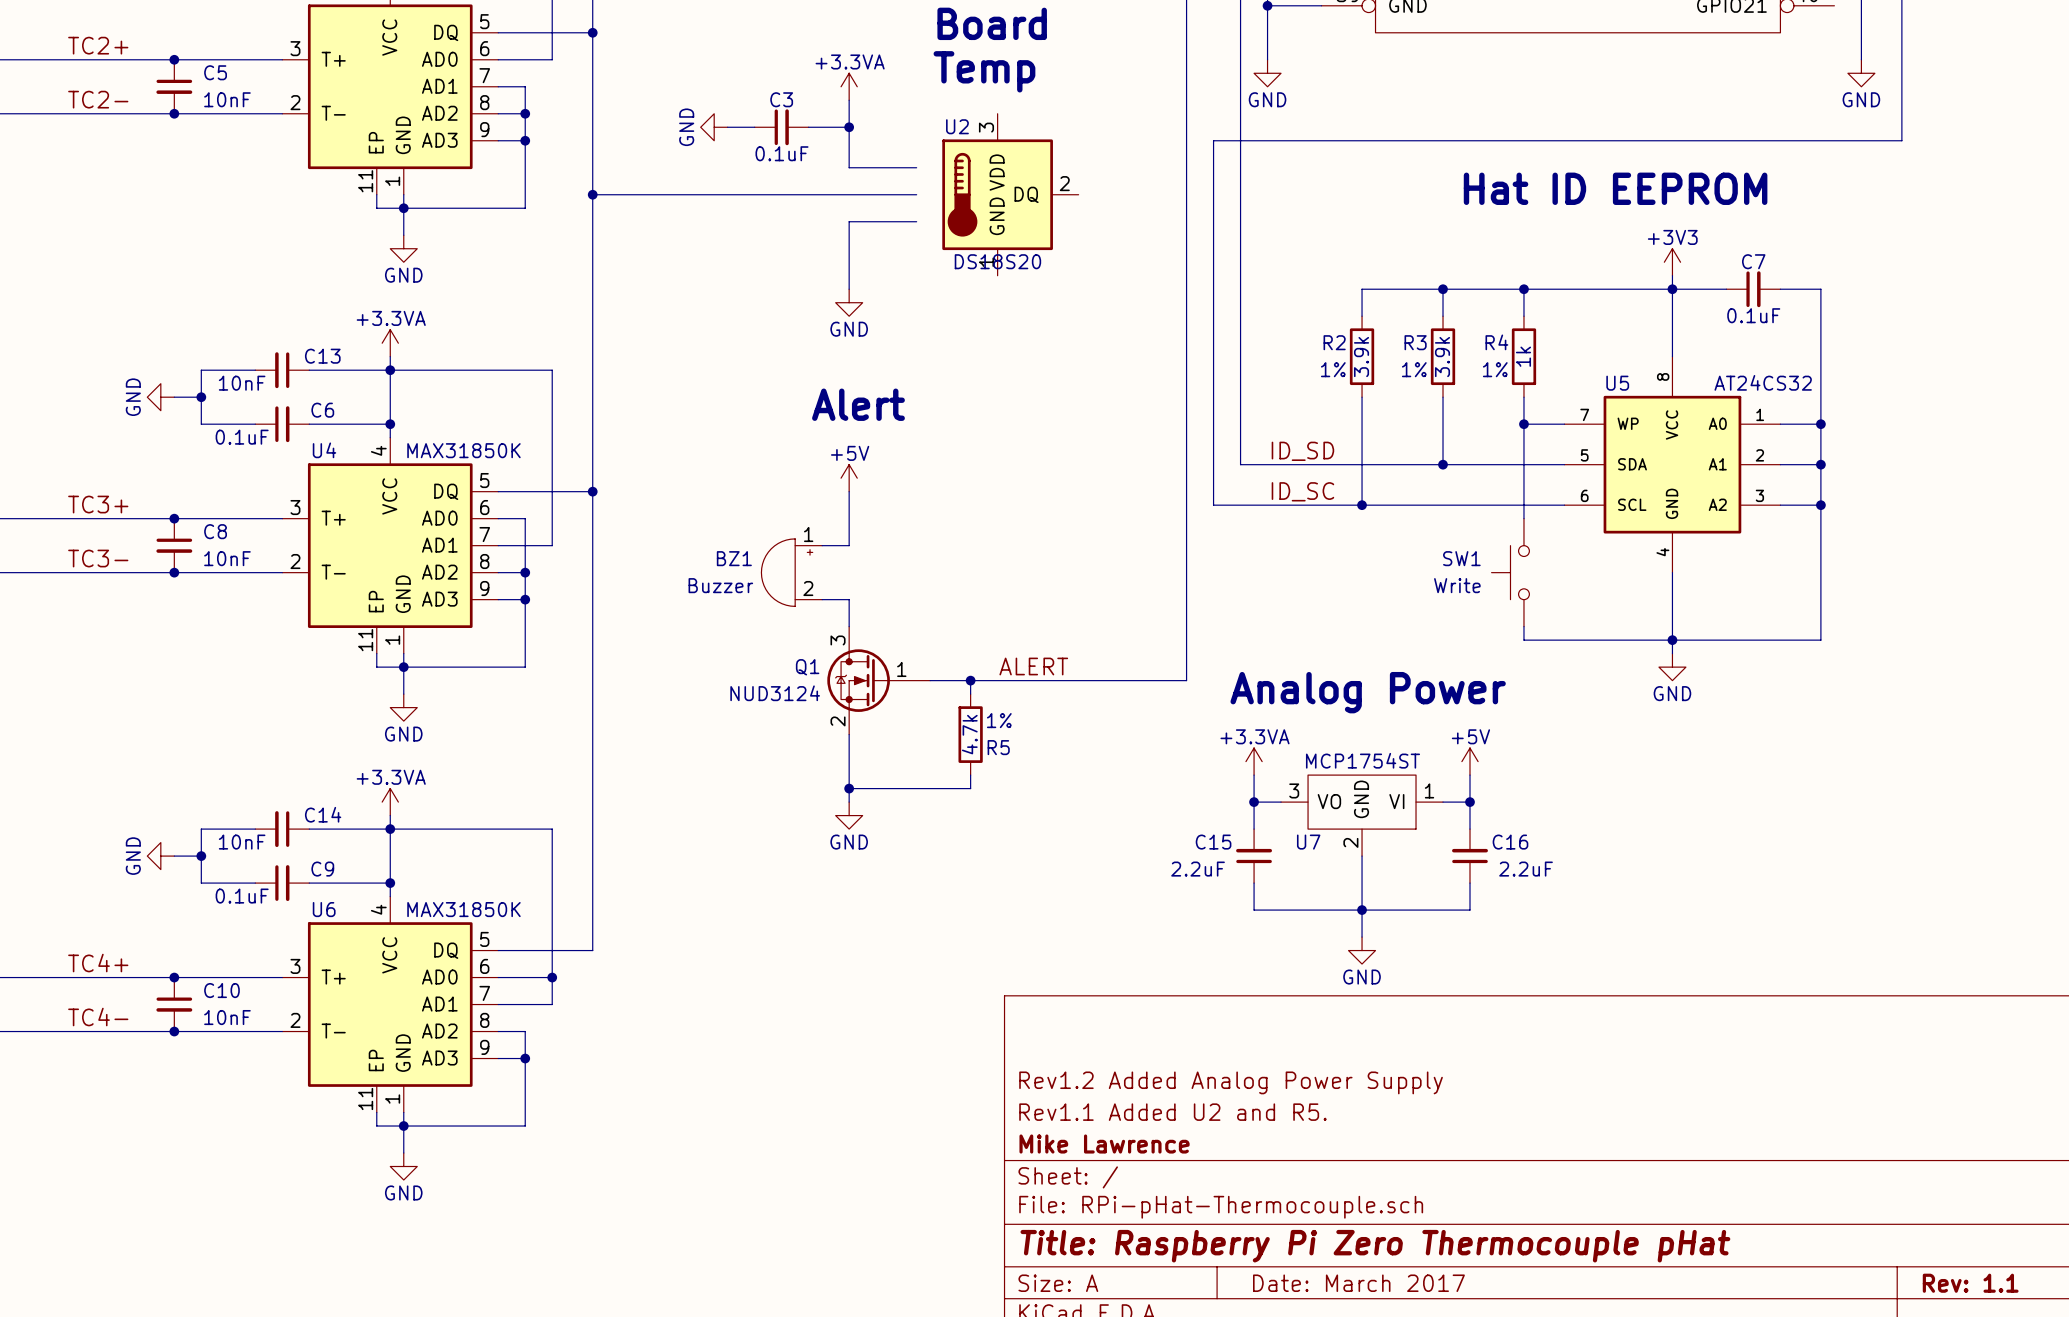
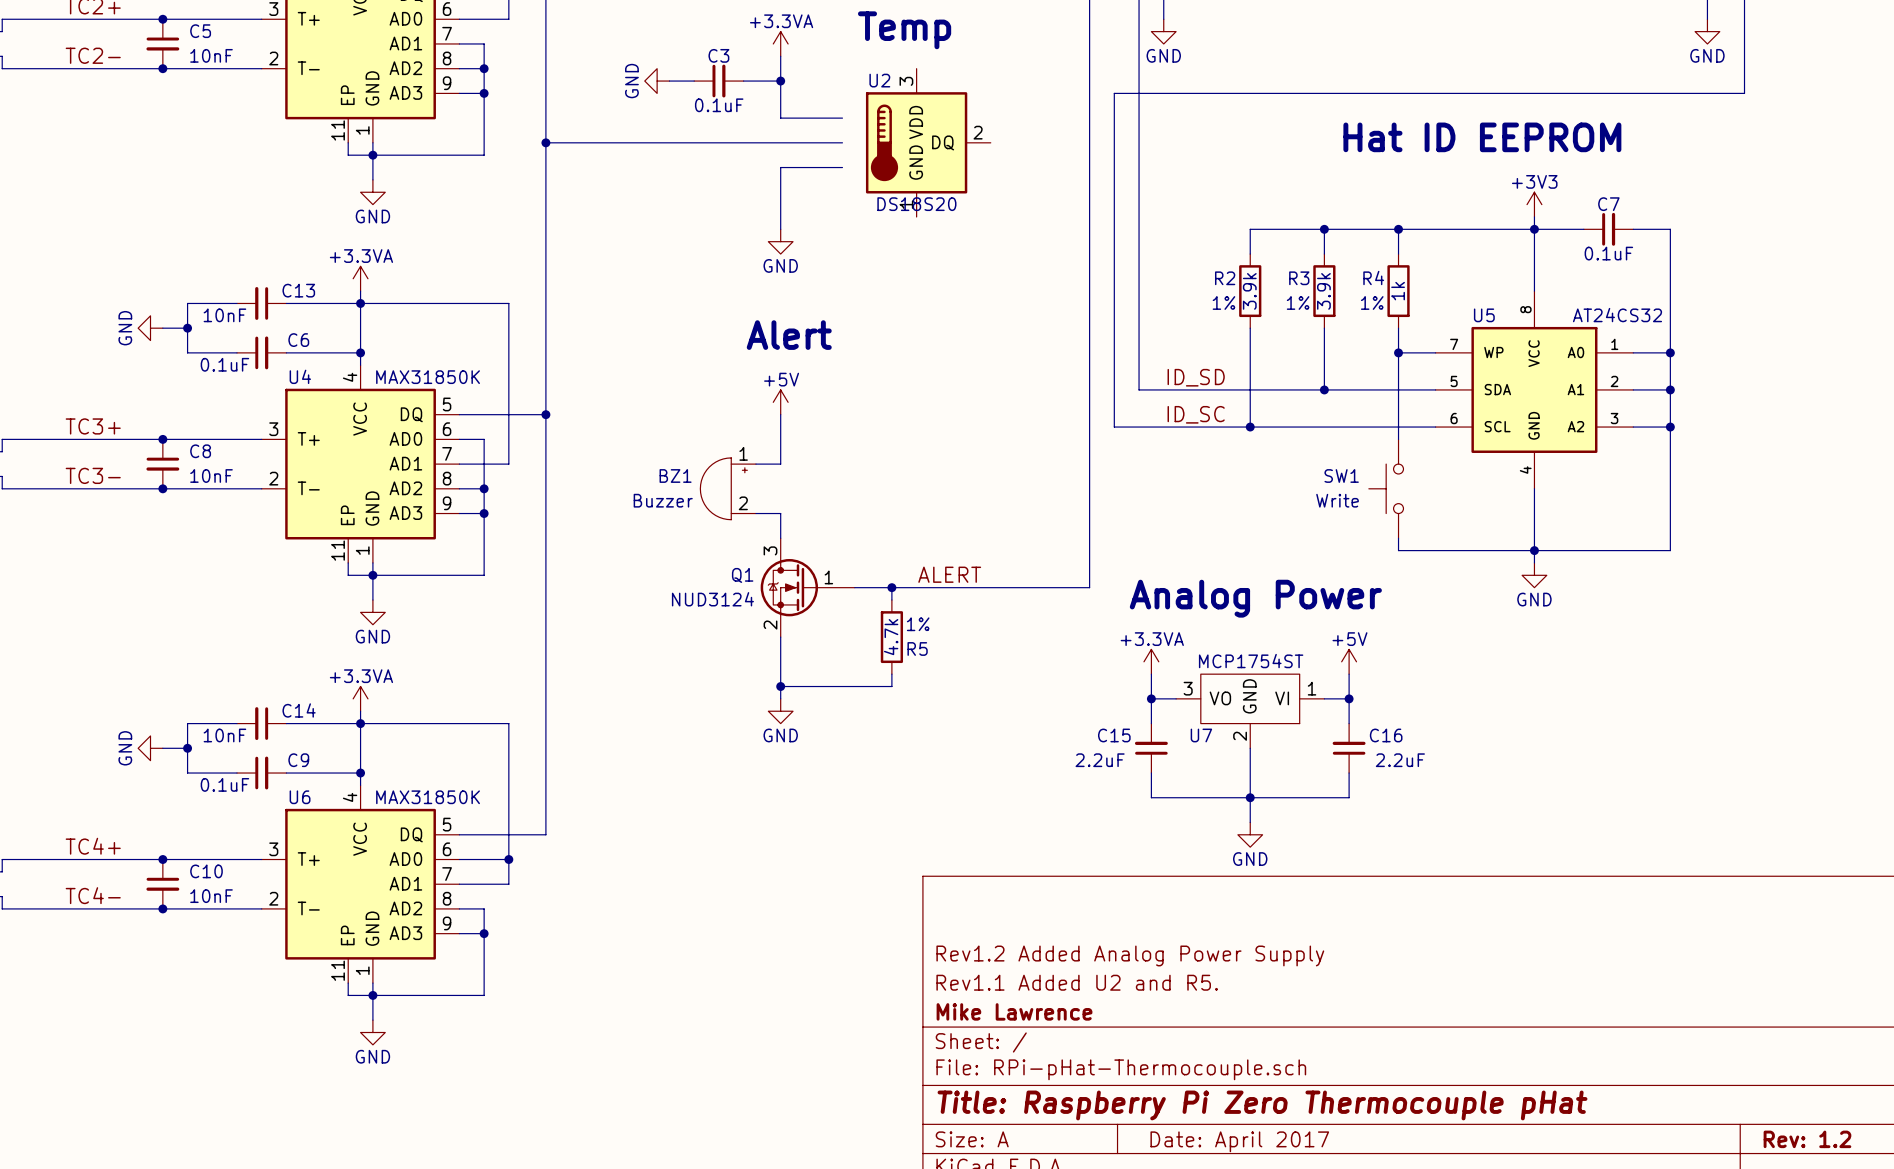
title block: Date: March 2017 (1358, 1283) -> Date: April 2017 (1239, 1141)
title block: Rev: 1.1 (1970, 1283) -> Rev: 1.2 (1807, 1139)

